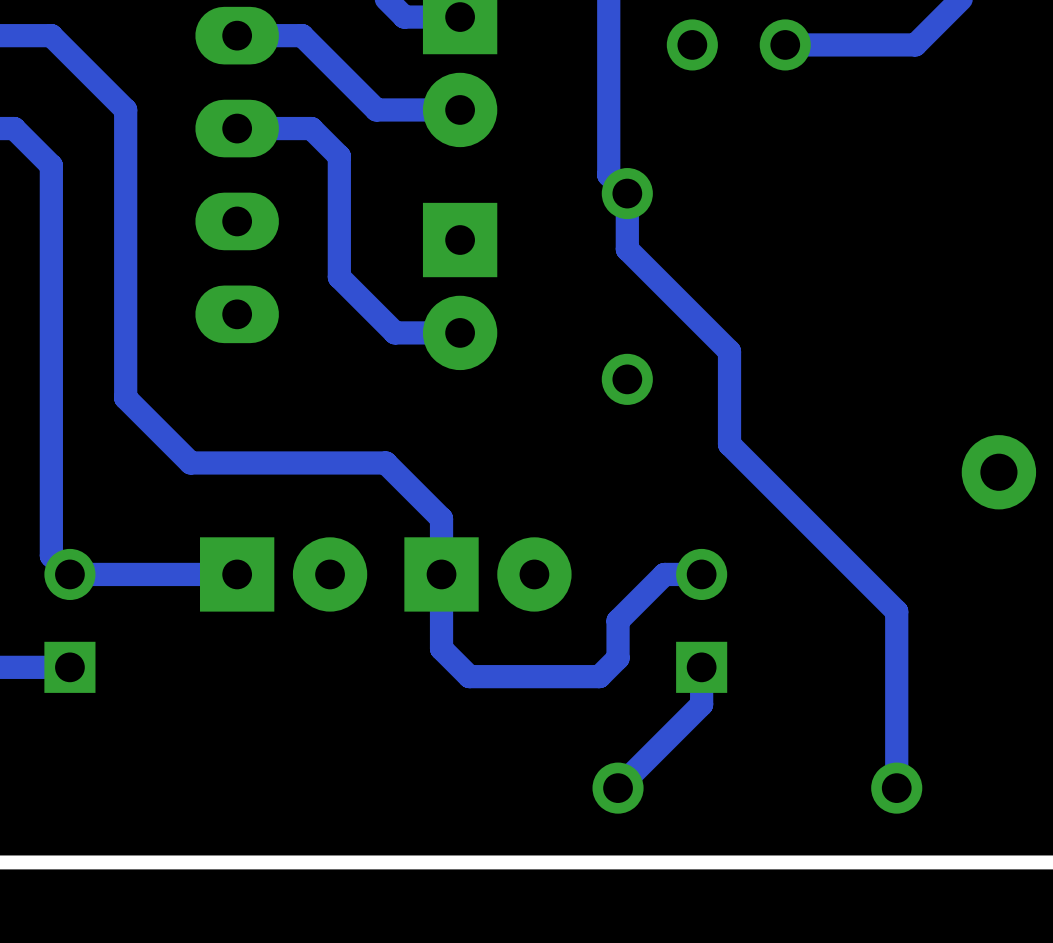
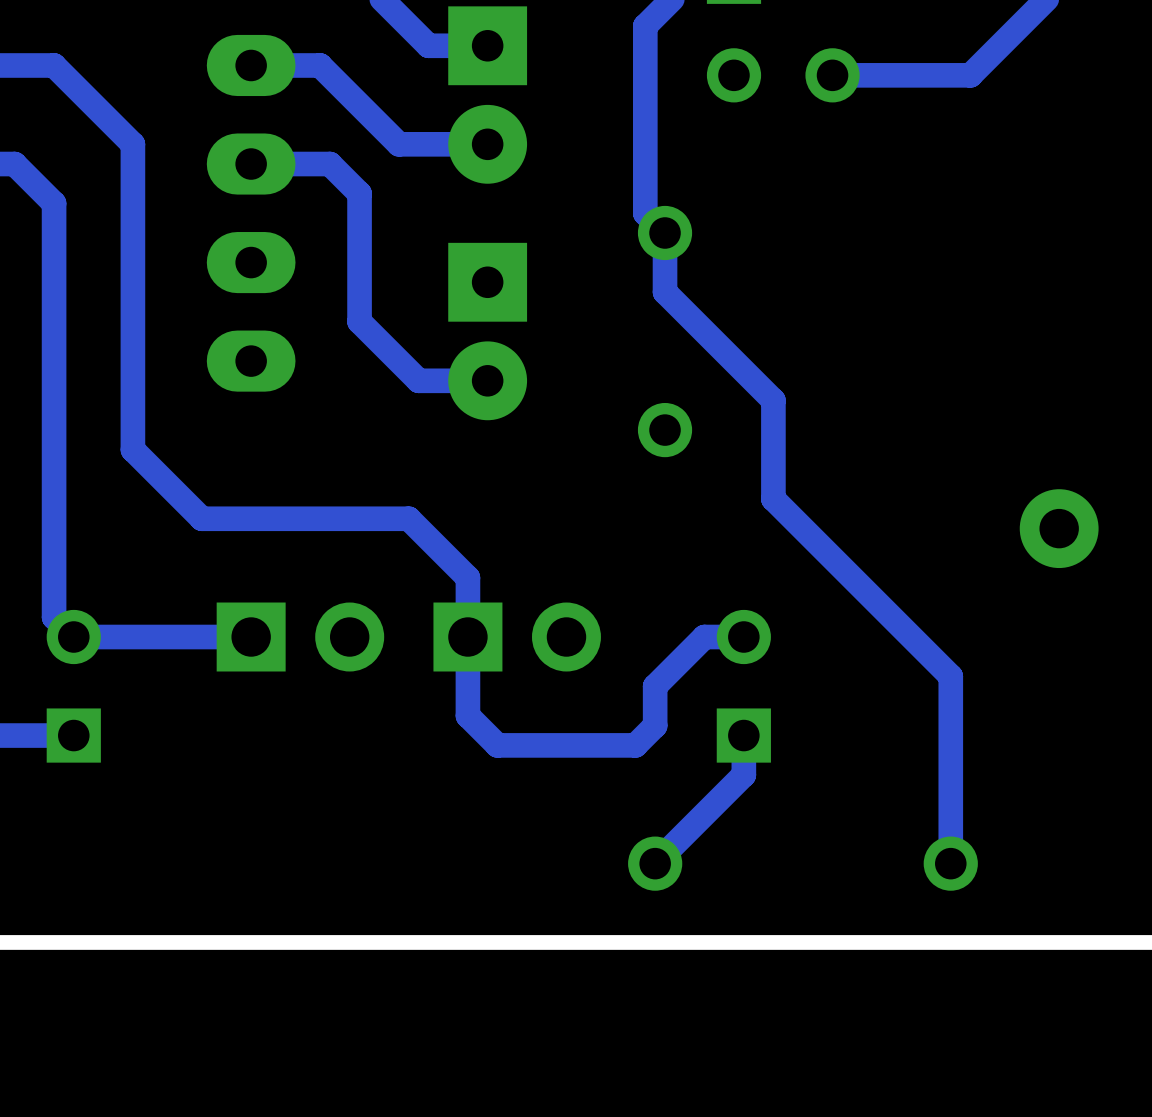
part footprint: [199, 537, 368, 612] -> [216, 602, 385, 672]
part footprint: [404, 537, 572, 612] -> [433, 602, 601, 672]

